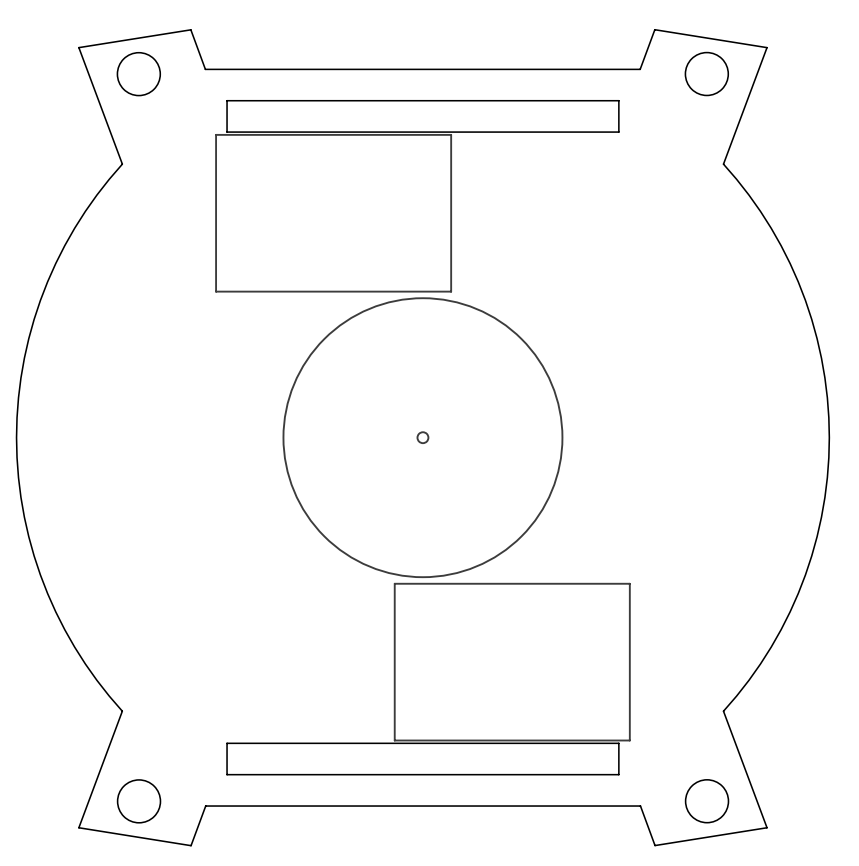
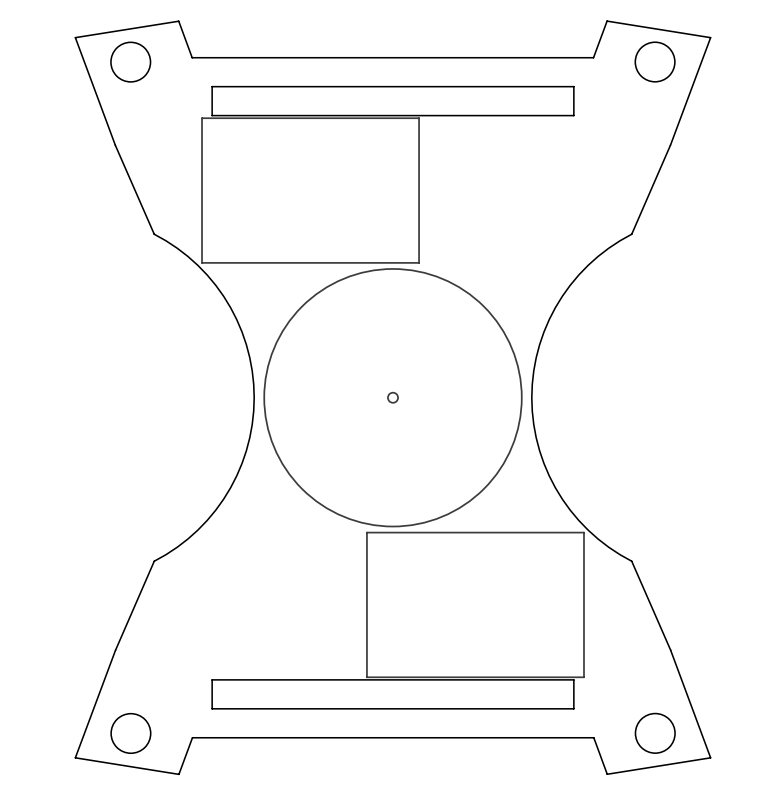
board edge: (78, 47) (122, 164) (96, 195) (74, 228) (55, 263) (40, 300) (24, 358) (18, 397) (16, 437) (20, 497) (28, 536) (40, 574) (55, 611) (74, 647) (96, 680) (122, 711) (78, 827) -> (75, 37) (115, 145) (154, 234) (177, 248) (197, 265) (215, 285) (236, 319) (249, 357) (254, 397) (249, 437) (236, 475) (223, 499) (207, 520) (187, 539) (154, 561) (115, 650) (75, 757)
board edge: (767, 47) (723, 164) (760, 211) (781, 245) (798, 281) (811, 319) (821, 358) (827, 397) (829, 437) (824, 497) (817, 536) (805, 574) (790, 611) (771, 647) (748, 680) (723, 711) (767, 827) -> (710, 37) (670, 145) (631, 234) (608, 248) (578, 275) (562, 296) (549, 319) (536, 357) (531, 397) (536, 437) (549, 475) (570, 510) (588, 530) (608, 547) (631, 561) (670, 650) (710, 757)

